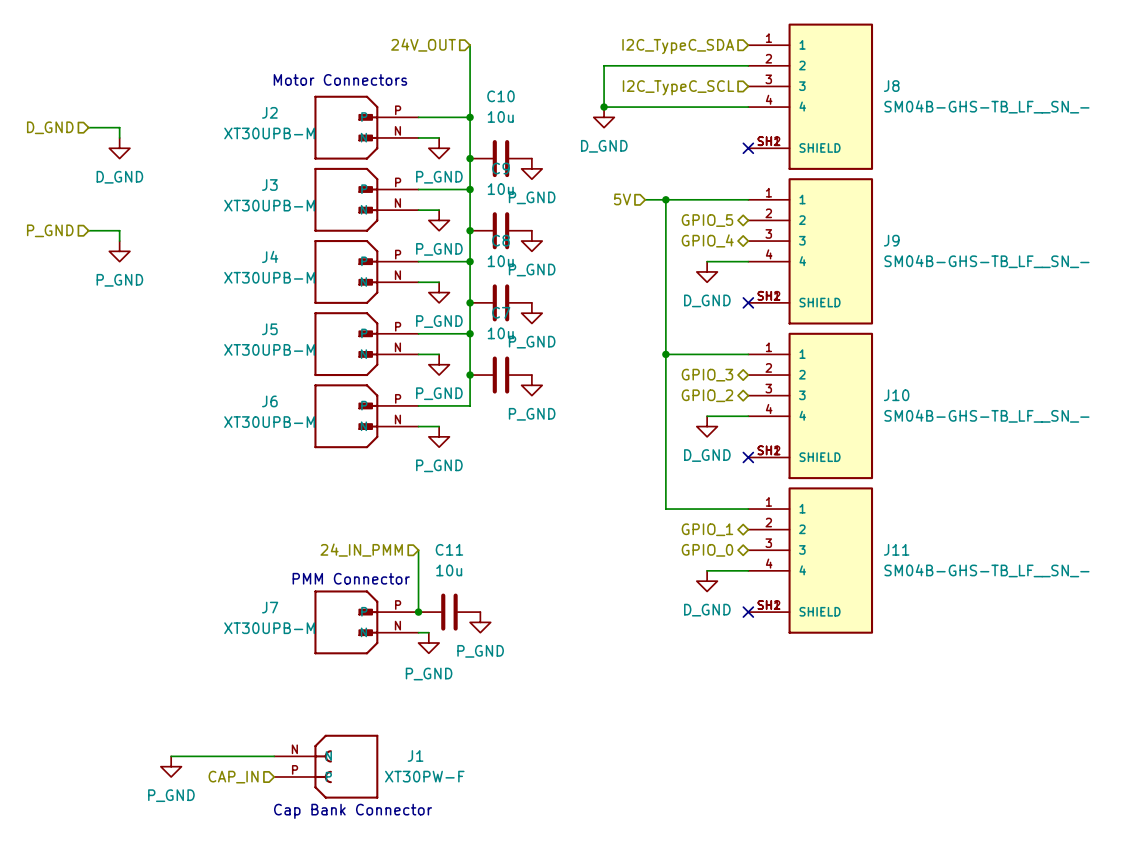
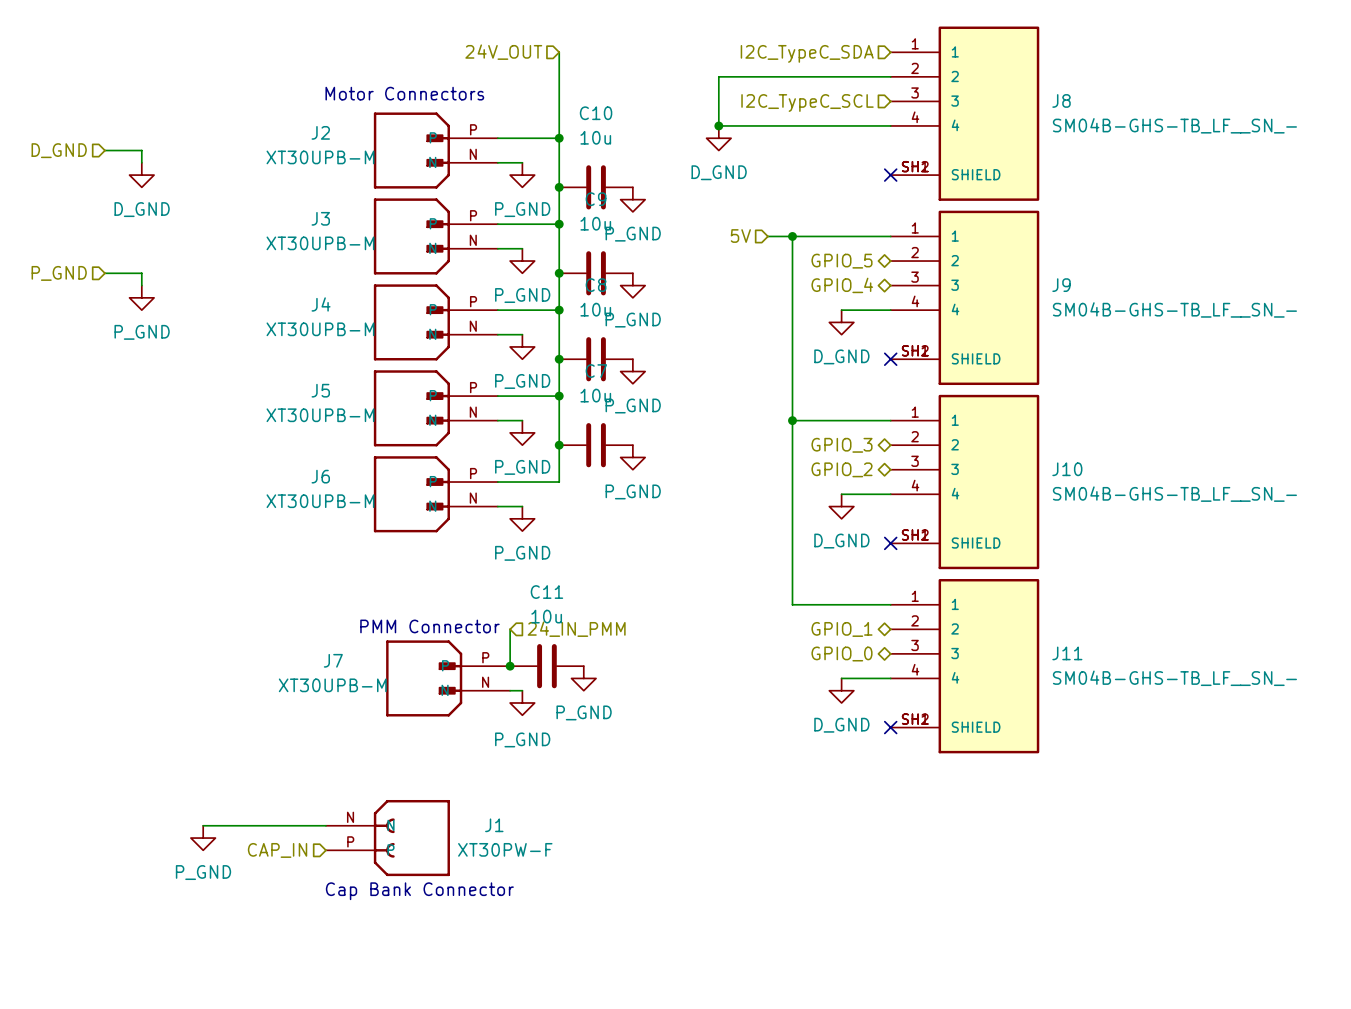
wire: none -> (510, 629) (510, 666)
hierarchical label rotation: 0° (361, 550) -> 180° (576, 629)
hierarchical label position: 24_IN_PMM (361, 550) -> 24_IN_PMM (576, 629)
wire: (418, 550) (418, 612) -> none
junction: none -> (510, 666)
power symbol: none -> P_GND (583, 678)
text position: PMM Connector (351, 578) -> PMM Connector (429, 626)
power symbol: none -> P_GND (522, 703)
junction: (418, 612) -> none
C11 position: (449, 612) -> (546, 666)
J7 position: (366, 622) -> (448, 678)
power symbol: P_GND (480, 622) -> none
wire: (418, 632) (428, 632) -> (510, 690) (522, 690)
power symbol: P_GND (428, 643) -> none
wire: (171, 756) (274, 756) -> (203, 825) (325, 825)
power symbol position: P_GND (171, 766) -> P_GND (203, 838)
J1 position: (326, 766) -> (387, 838)
hierarchical label position: CAP_IN (233, 777) -> CAP_IN (277, 850)
text position: Cap Bank Connector (353, 811) -> Cap Bank Connector (419, 891)

